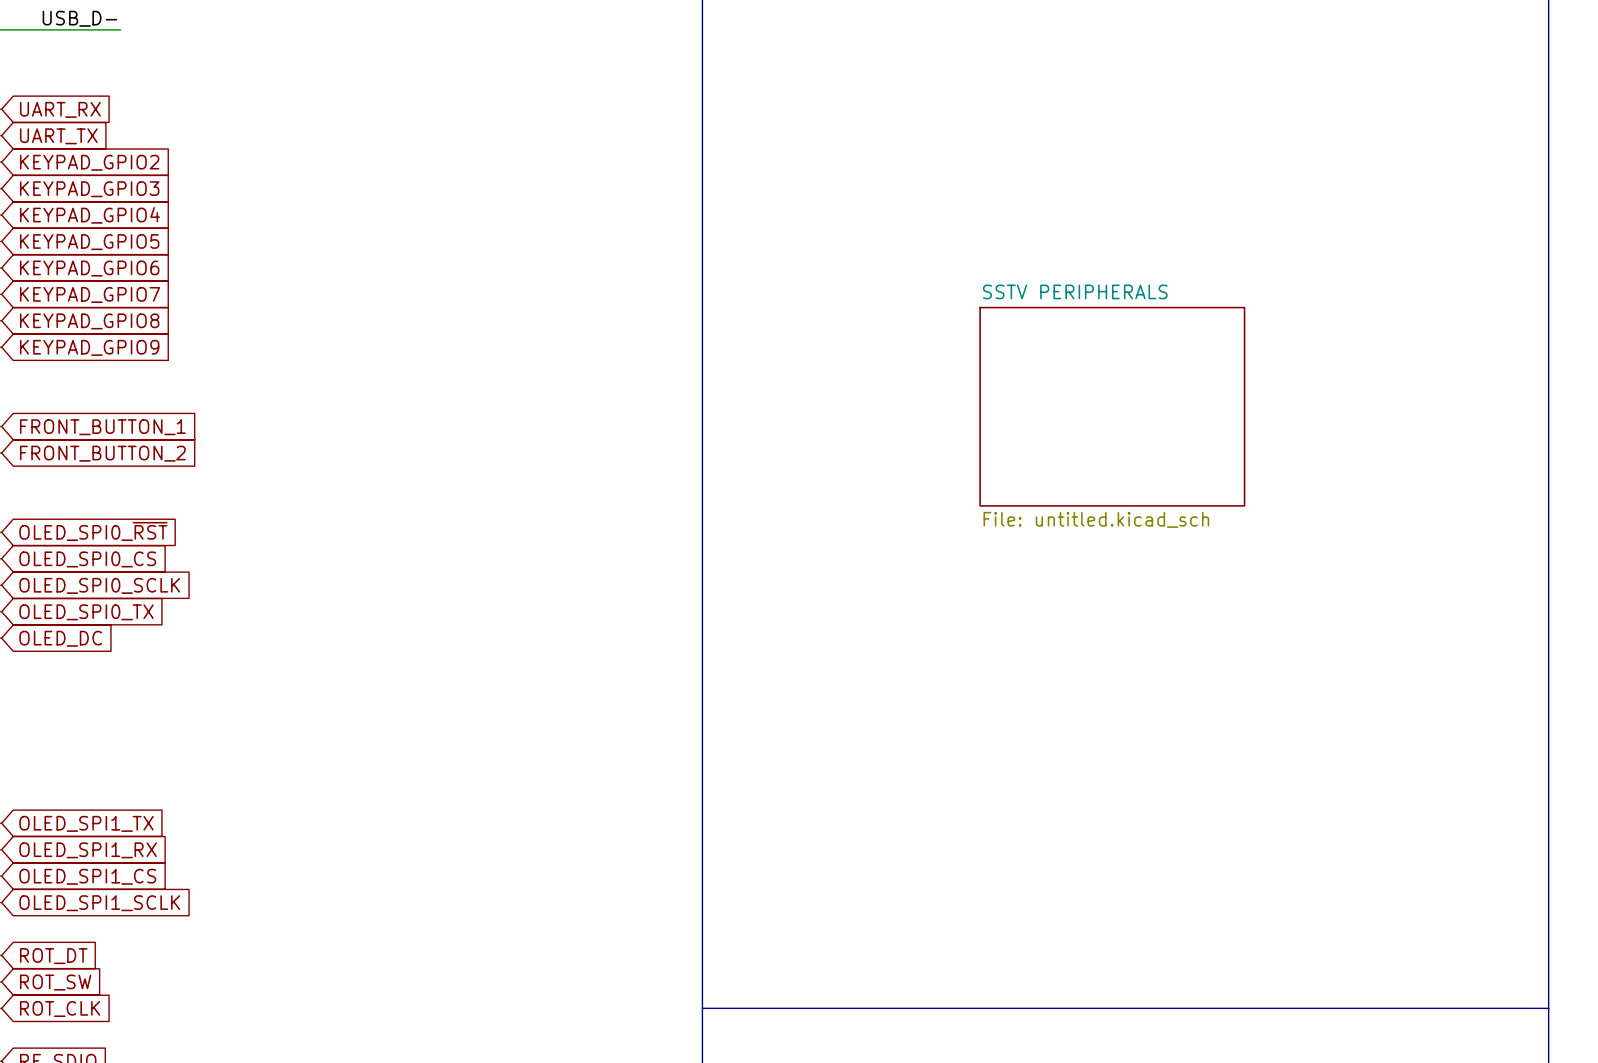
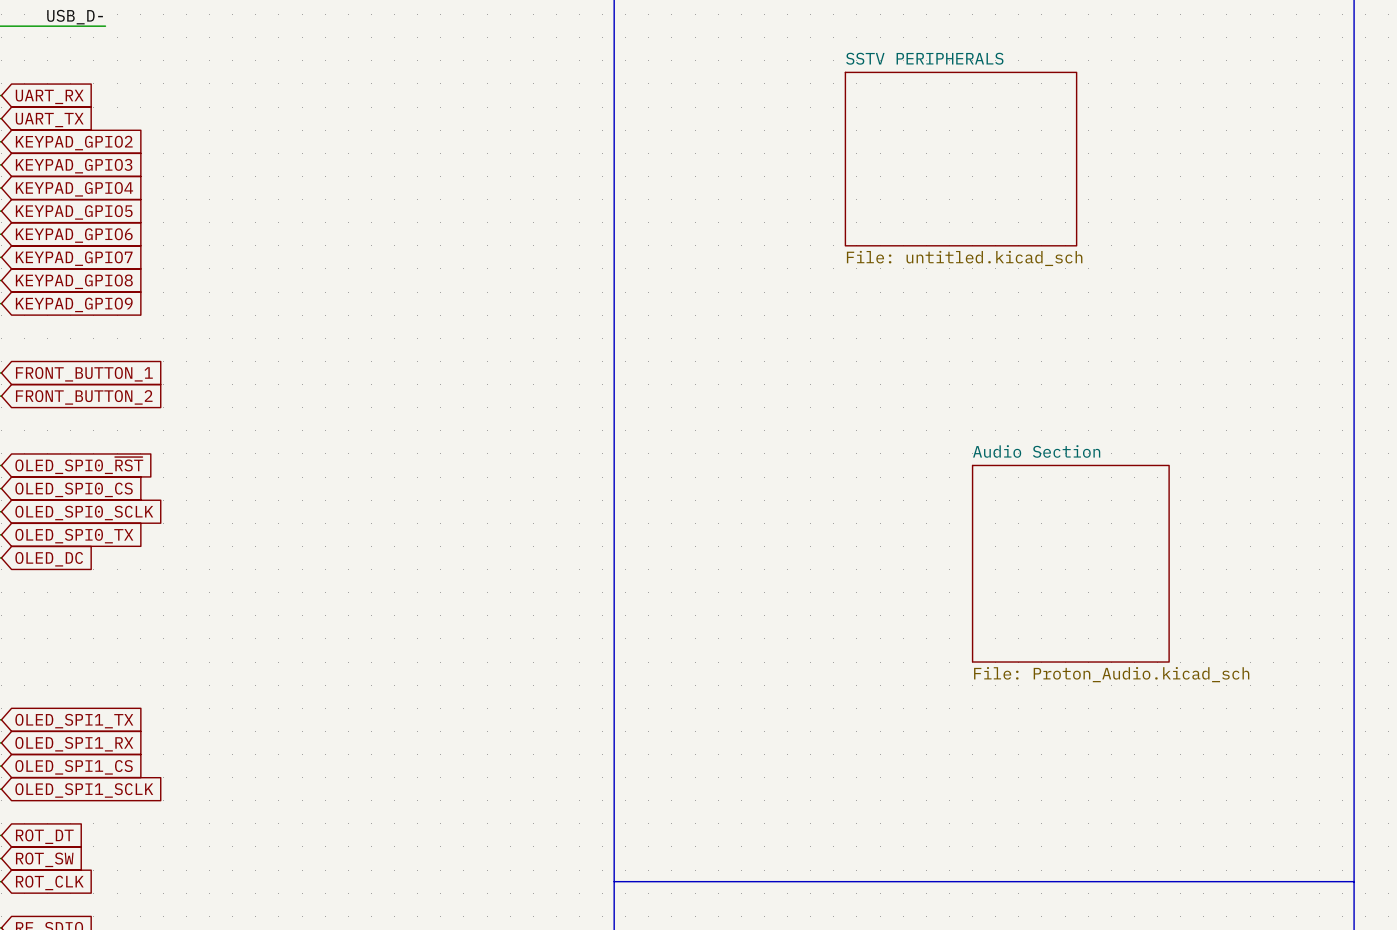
sheet SSTV PERIPHERALS position: (1112, 406) -> (961, 159)
sheet Audio Section: none -> File: Proton_Audio.kicad_sch (1070, 563)

